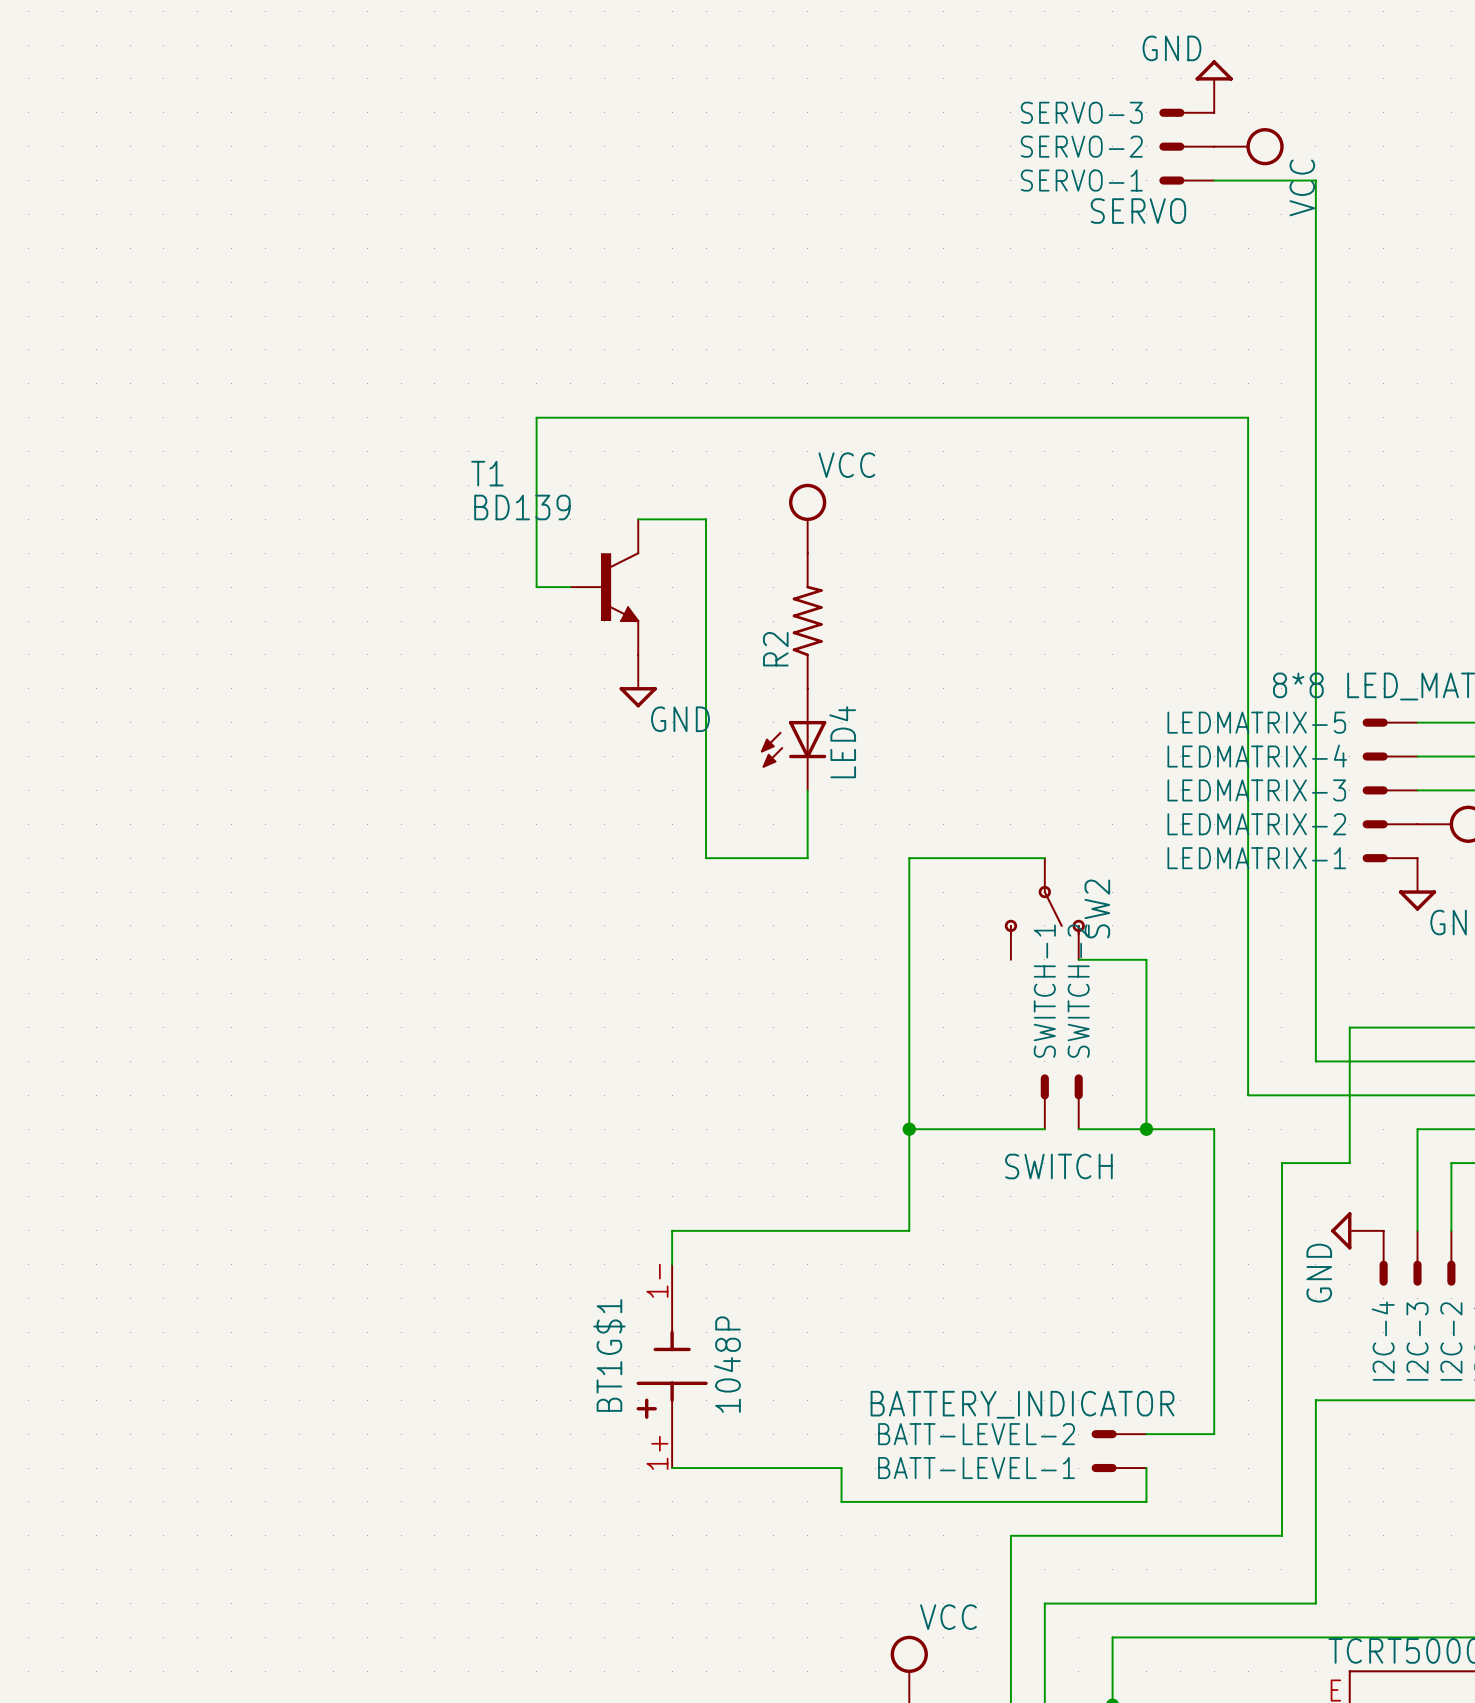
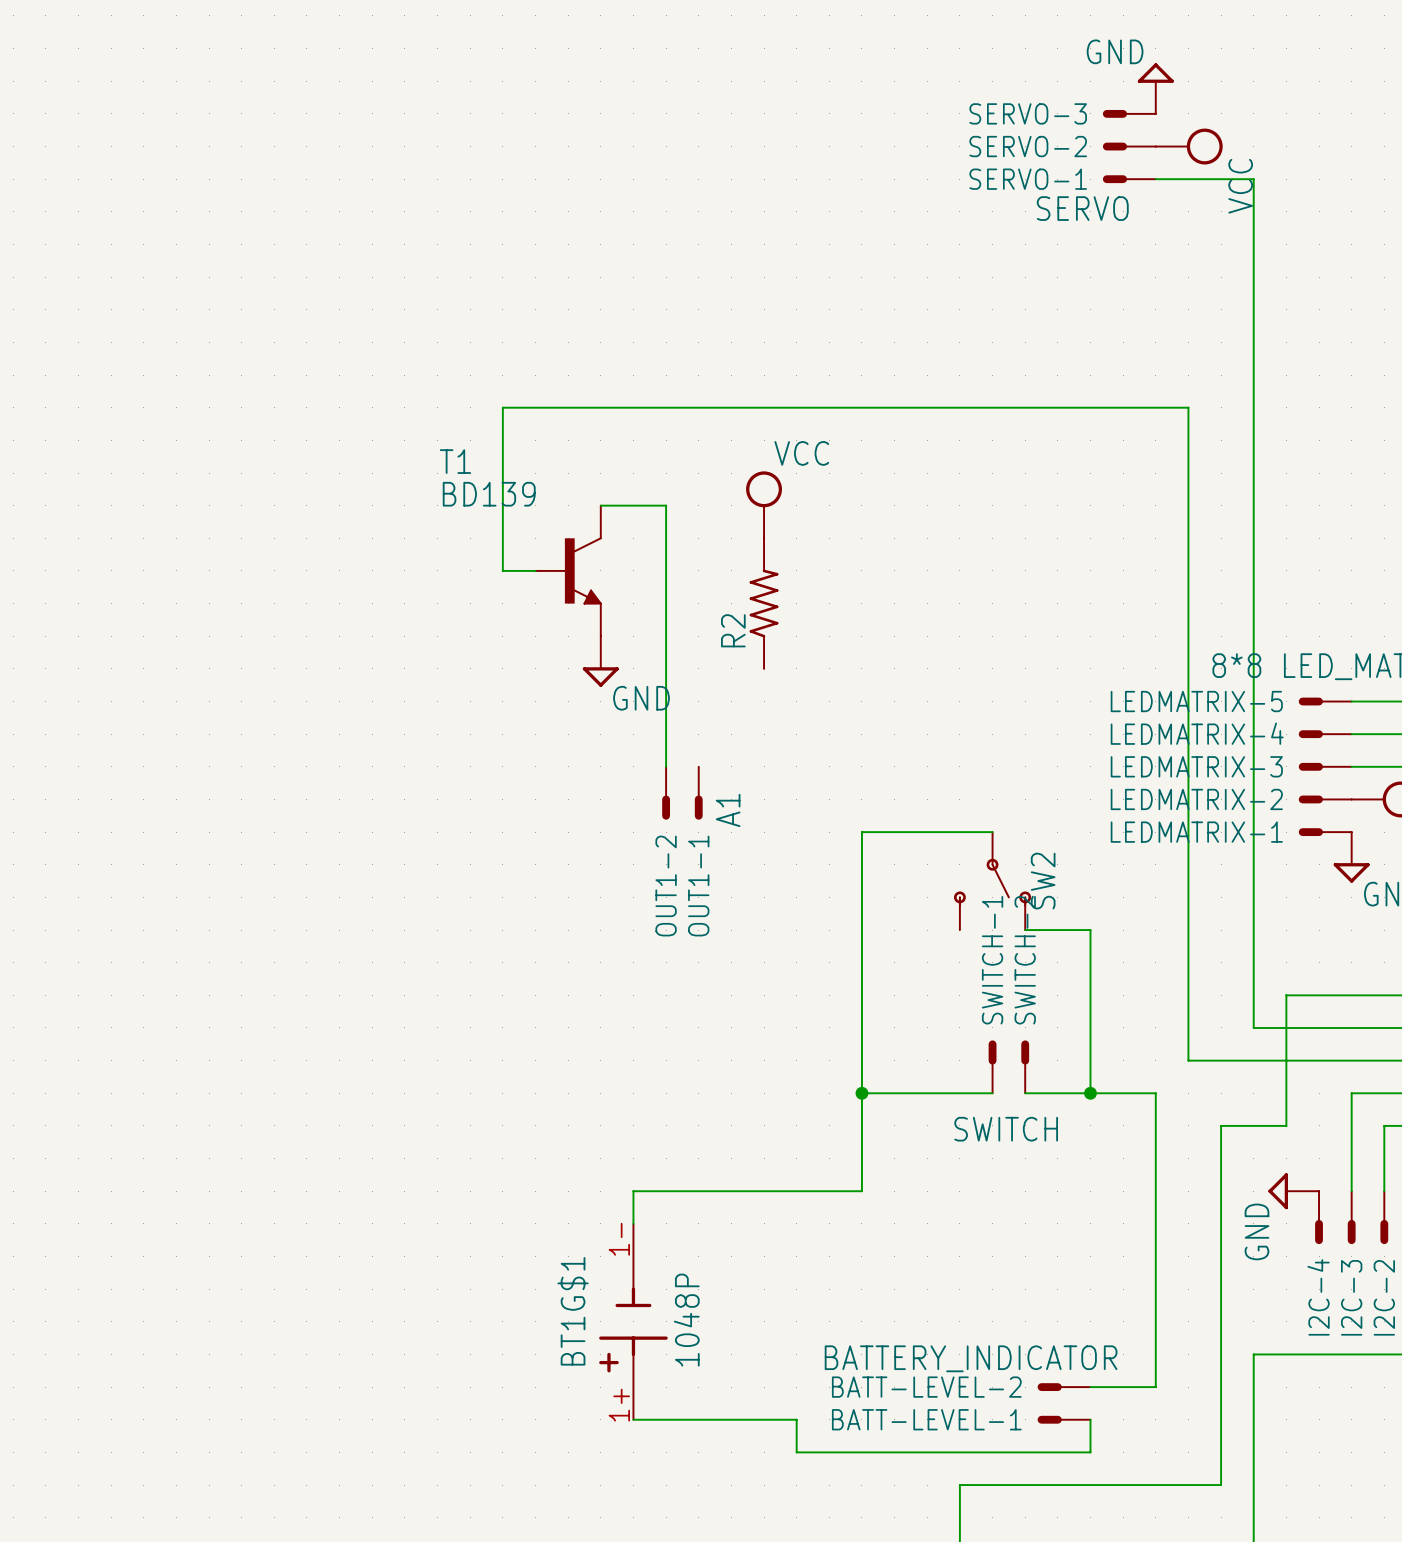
LED4: (793, 739) -> none
wire: (706, 790) (706, 858) (807, 858) (807, 790) -> none
OUT1-2: none -> (666, 793)
OUT1-1: none -> A1 (698, 793)

